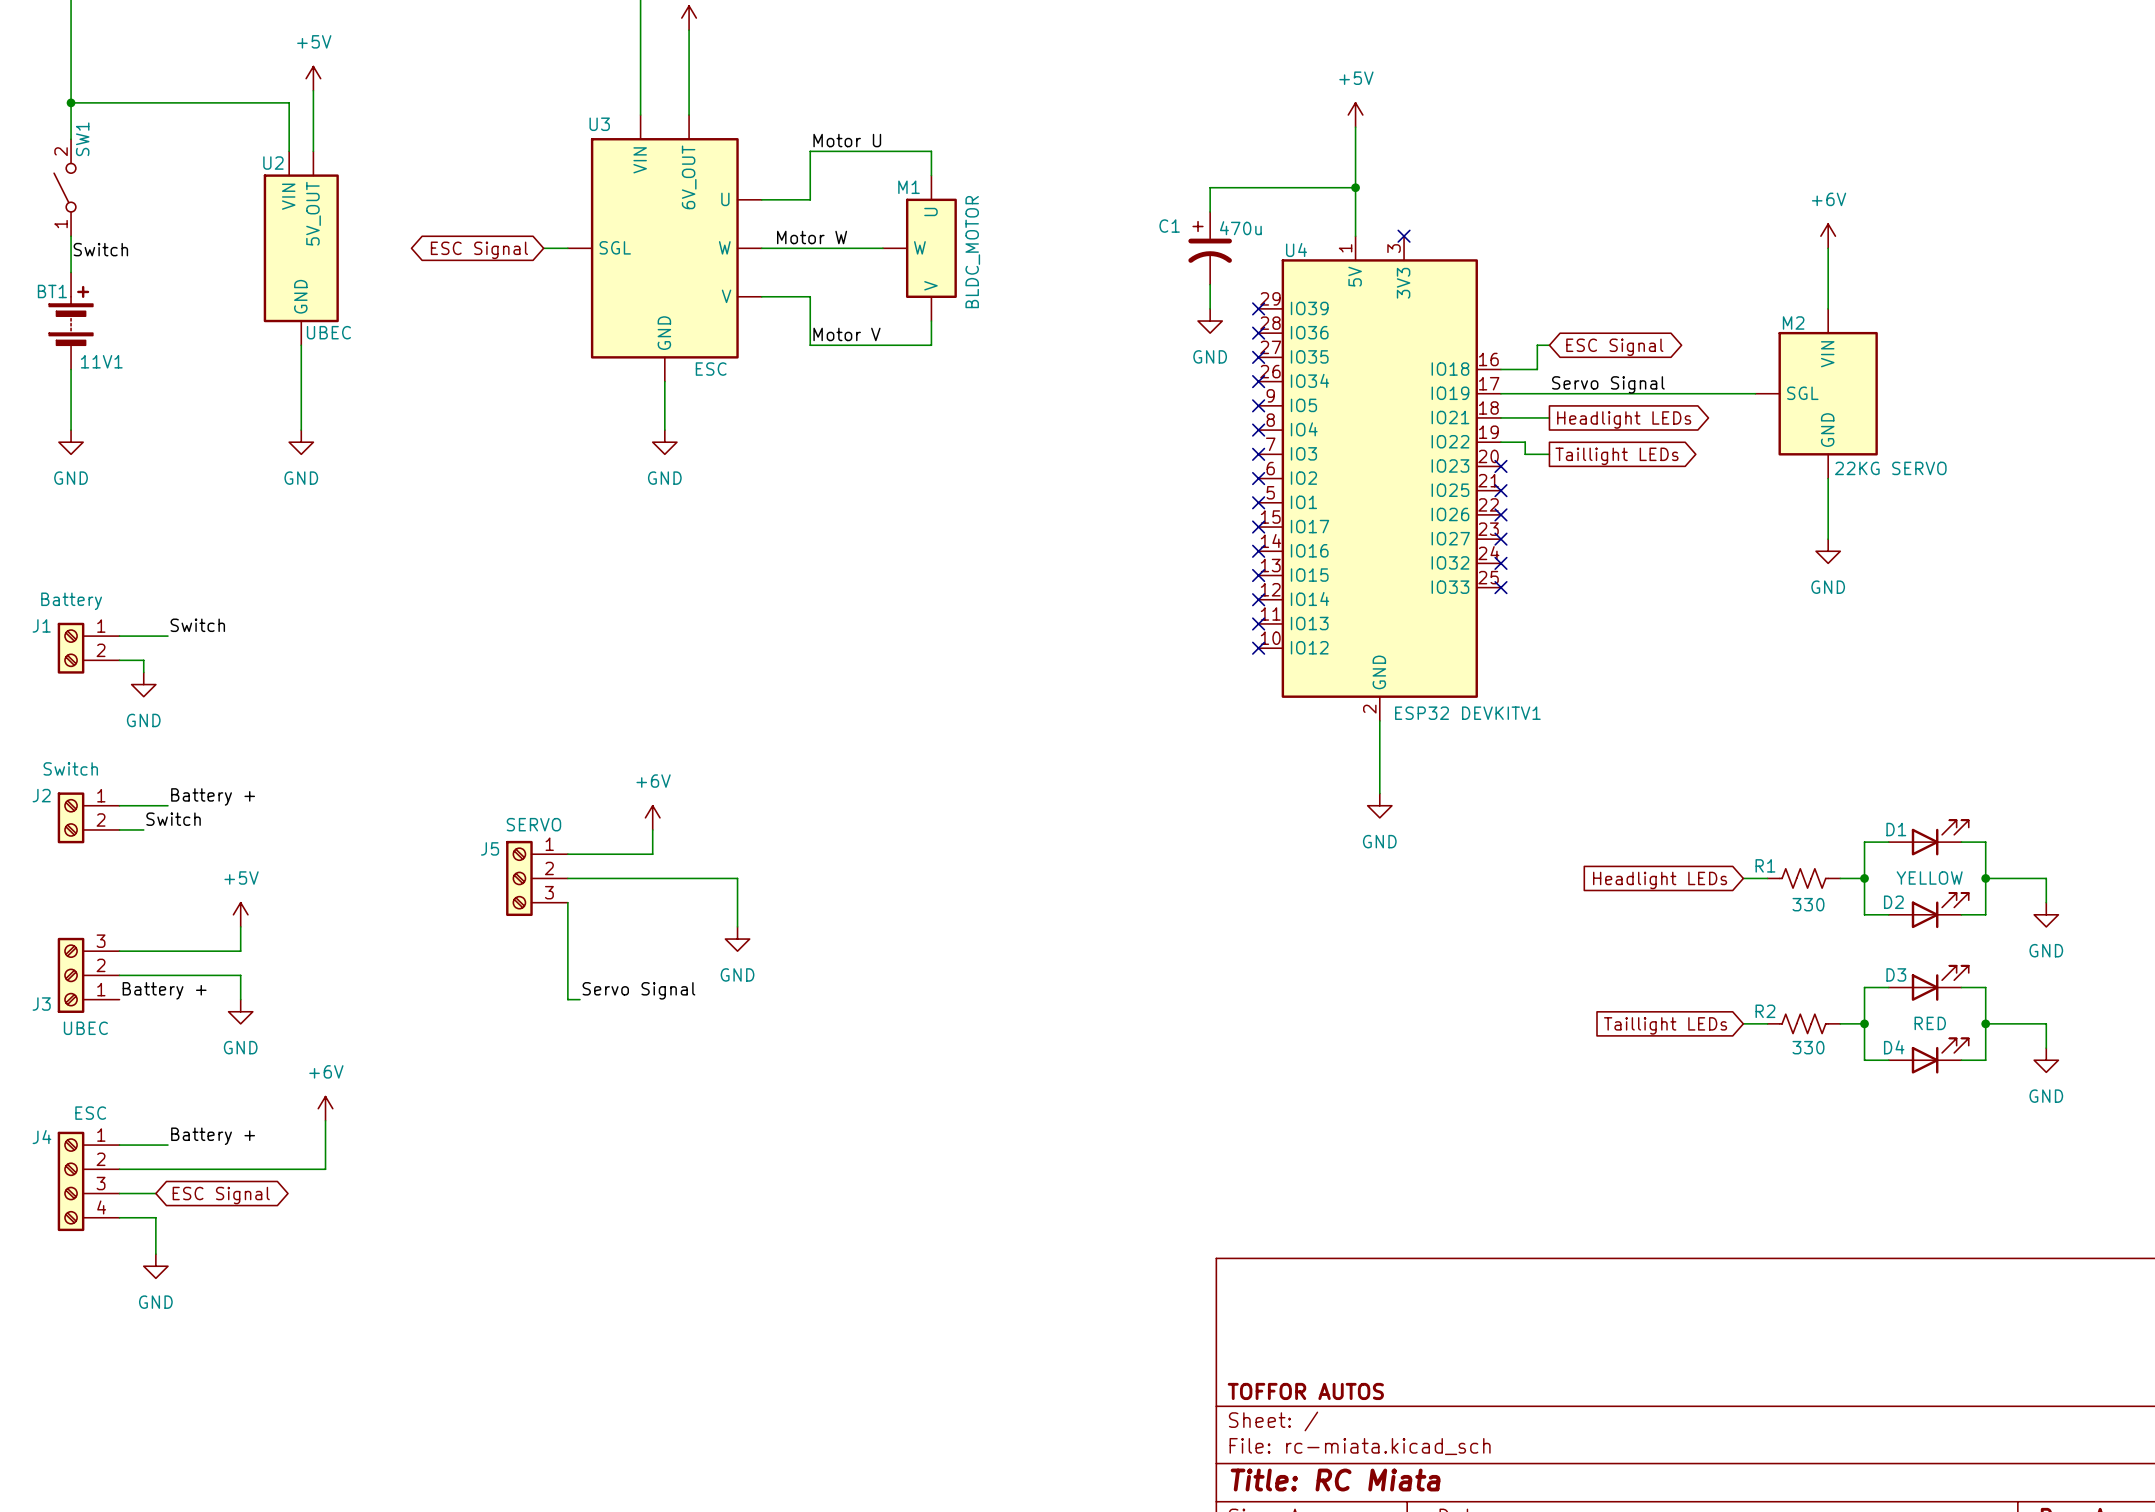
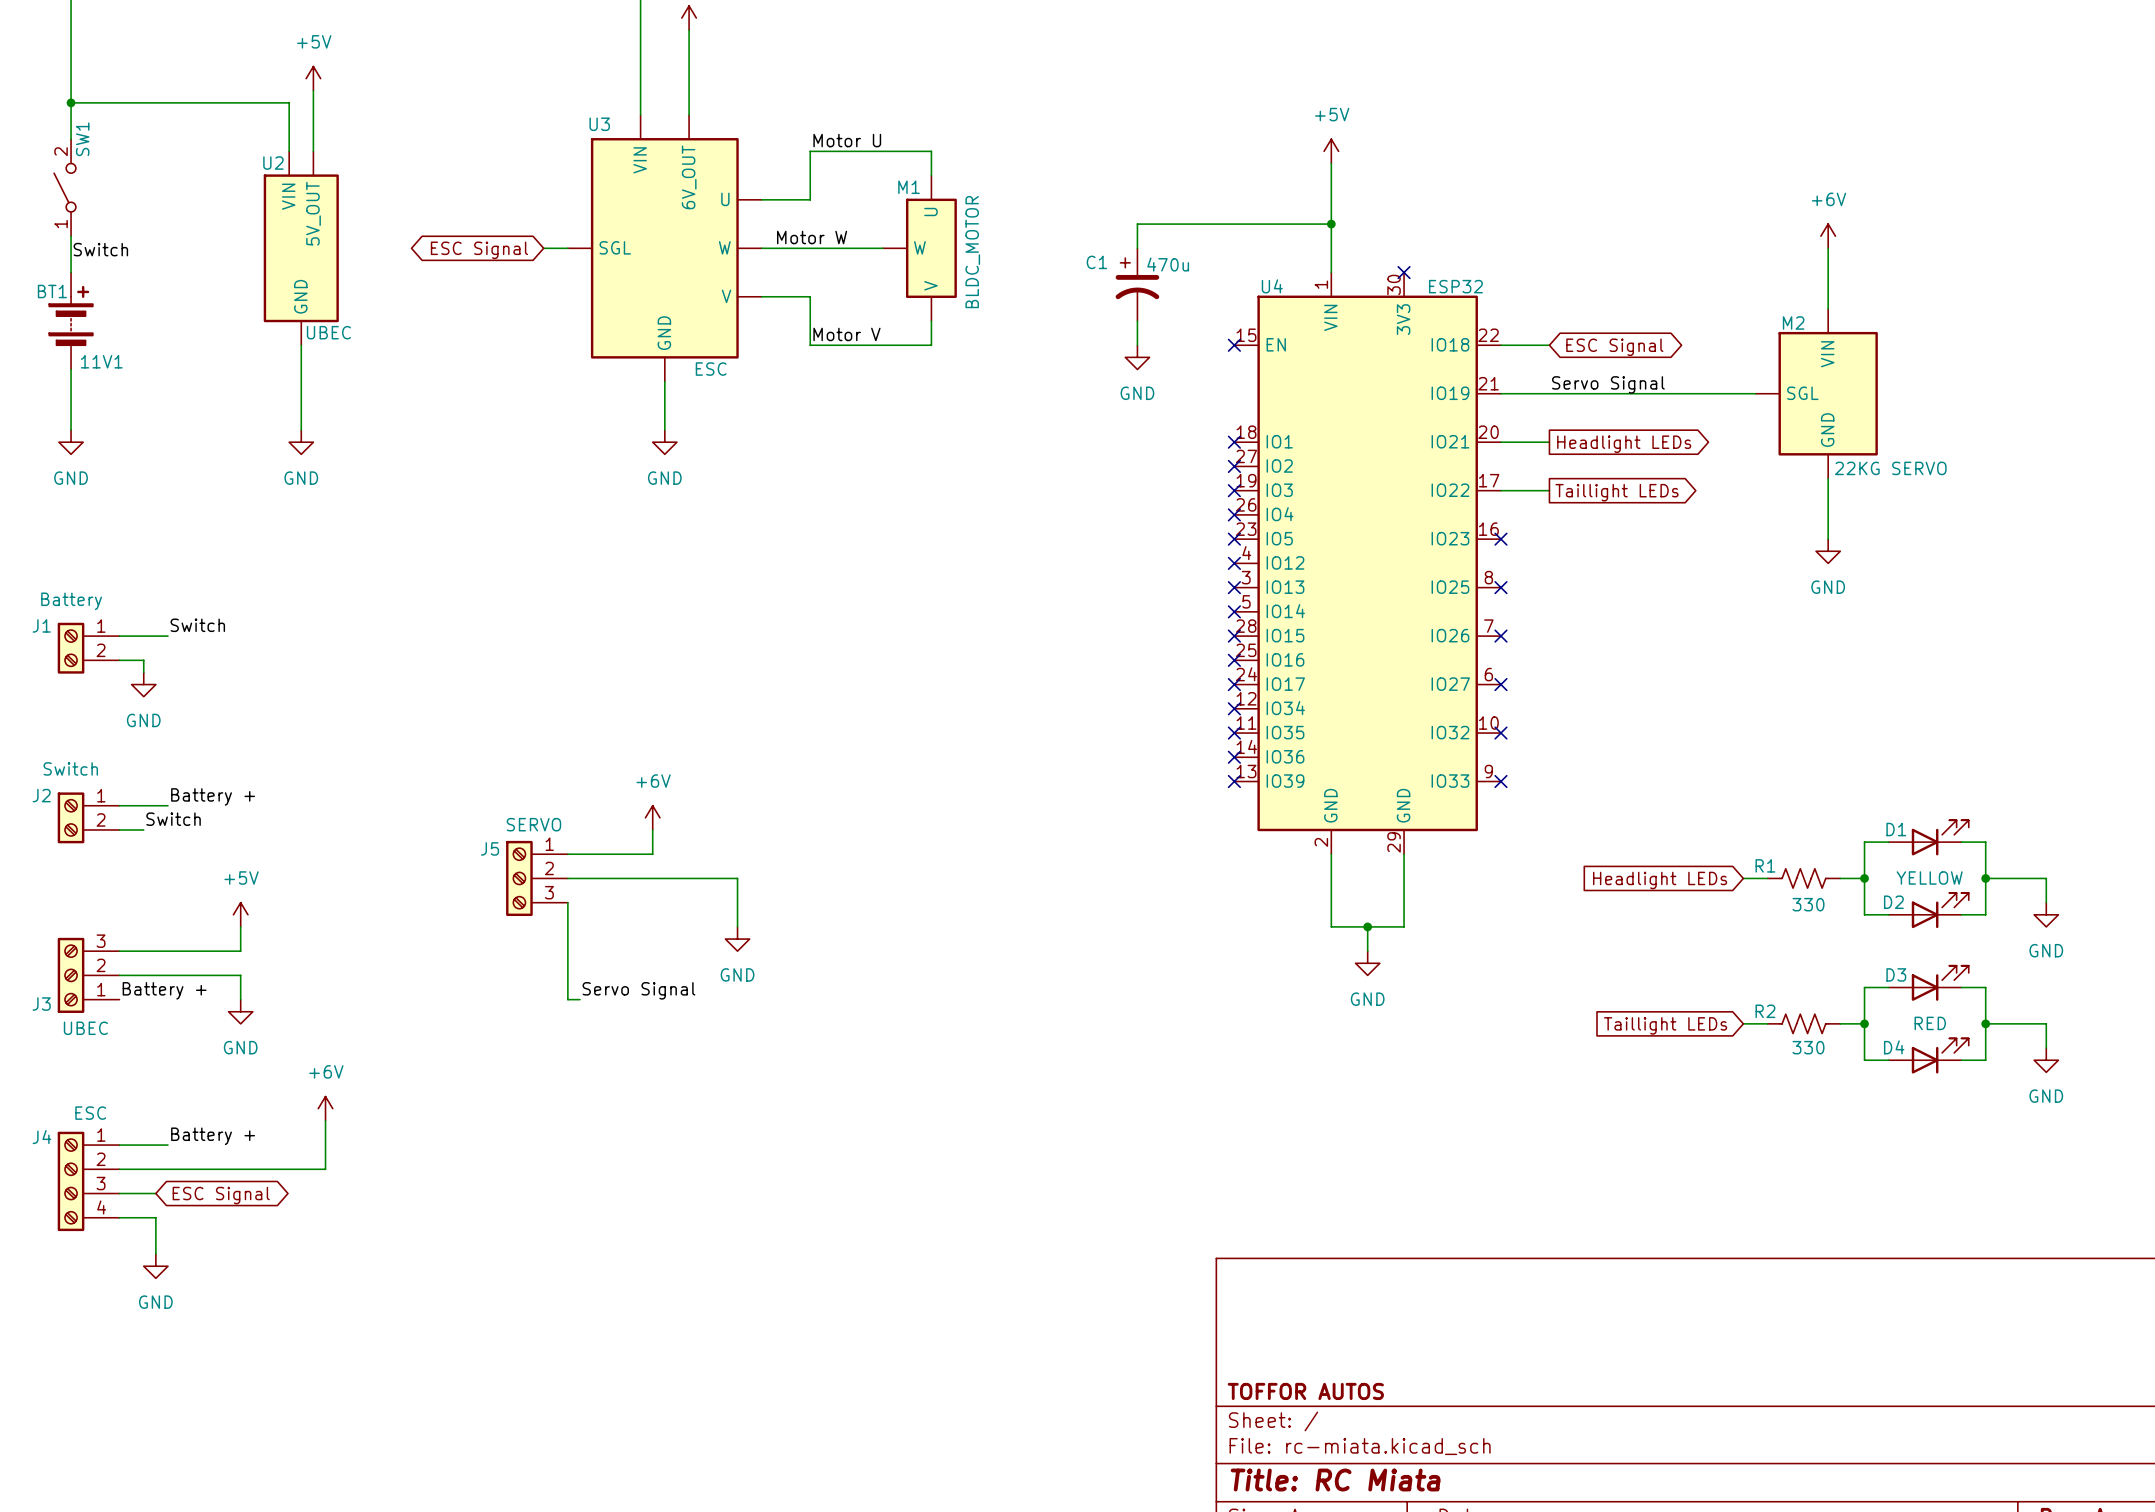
power symbol position: +5V (1355, 115) -> +5V (1331, 151)
wire: (1355, 127) (1355, 236) -> (1331, 163) (1331, 272)
wire: (1355, 187) (1210, 187) (1210, 211) -> none
junction position: (1355, 187) -> (1331, 224)
wire: none -> (1331, 224) (1137, 224) (1137, 248)
U4 symbol: [1258, 236, 1501, 721] -> [1234, 272, 1501, 855]
no-connect mark position: (1404, 236) -> (1404, 272)
C1 position: (1210, 248) -> (1137, 284)
U4 name position: U4 (1296, 249) -> U4 (1272, 286)
wire: (1210, 284) (1210, 308) -> (1137, 321) (1137, 345)
no-connect mark: (1258, 308) -> none
power symbol position: GND (1210, 321) -> GND (1137, 357)
no-connect mark: (1258, 333) -> none
no-connect mark: none -> (1234, 345)
wire: (1537, 345) (1537, 369) (1500, 369) -> (1537, 345) (1500, 345)
no-connect mark: (1258, 357) -> none
no-connect mark: (1258, 381) -> none
no-connect mark: (1258, 405) -> none
wire: (1500, 417) (1549, 417) -> (1500, 490) (1549, 490)
global label position: Headlight LEDs (1624, 419) -> Headlight LEDs (1624, 444)
no-connect mark: (1258, 430) -> none
no-connect mark: none -> (1234, 442)
wire: (1525, 442) (1525, 454) (1549, 454) -> (1525, 442) (1549, 442)
no-connect mark: (1258, 454) -> none
global label position: Taillight LEDs (1616, 456) -> Taillight LEDs (1616, 492)
no-connect mark: none -> (1234, 466)
no-connect mark: (1500, 466) -> none
no-connect mark: (1258, 478) -> none
no-connect mark: none -> (1234, 490)
no-connect mark: (1500, 490) -> none
no-connect mark: (1258, 502) -> none
no-connect mark: none -> (1234, 514)
no-connect mark: (1500, 514) -> none
no-connect mark: (1258, 527) -> none
no-connect mark: none -> (1234, 539)
no-connect mark: (1258, 551) -> none
no-connect mark: none -> (1234, 563)
no-connect mark: (1500, 563) -> none
no-connect mark: (1258, 575) -> none
no-connect mark: none -> (1234, 587)
no-connect mark: (1258, 599) -> none
no-connect mark: none -> (1234, 611)
no-connect mark: (1258, 623) -> none
no-connect mark: none -> (1234, 636)
no-connect mark: none -> (1500, 636)
no-connect mark: (1258, 648) -> none
no-connect mark: none -> (1234, 660)
no-connect mark: none -> (1234, 684)
no-connect mark: none -> (1500, 684)
no-connect mark: none -> (1234, 708)
U4 value: ESP32 DEVKITV1 (1467, 713) -> ESP32 (1455, 286)
no-connect mark: none -> (1234, 733)
no-connect mark: none -> (1500, 733)
no-connect mark: none -> (1234, 757)
no-connect mark: none -> (1234, 781)
no-connect mark: none -> (1500, 781)
power symbol position: GND (1379, 805) -> GND (1367, 963)
wire: none -> (1331, 854) (1331, 926) (1404, 926) (1404, 854)
wire: none -> (1367, 926) (1367, 951)
junction: none -> (1367, 926)

